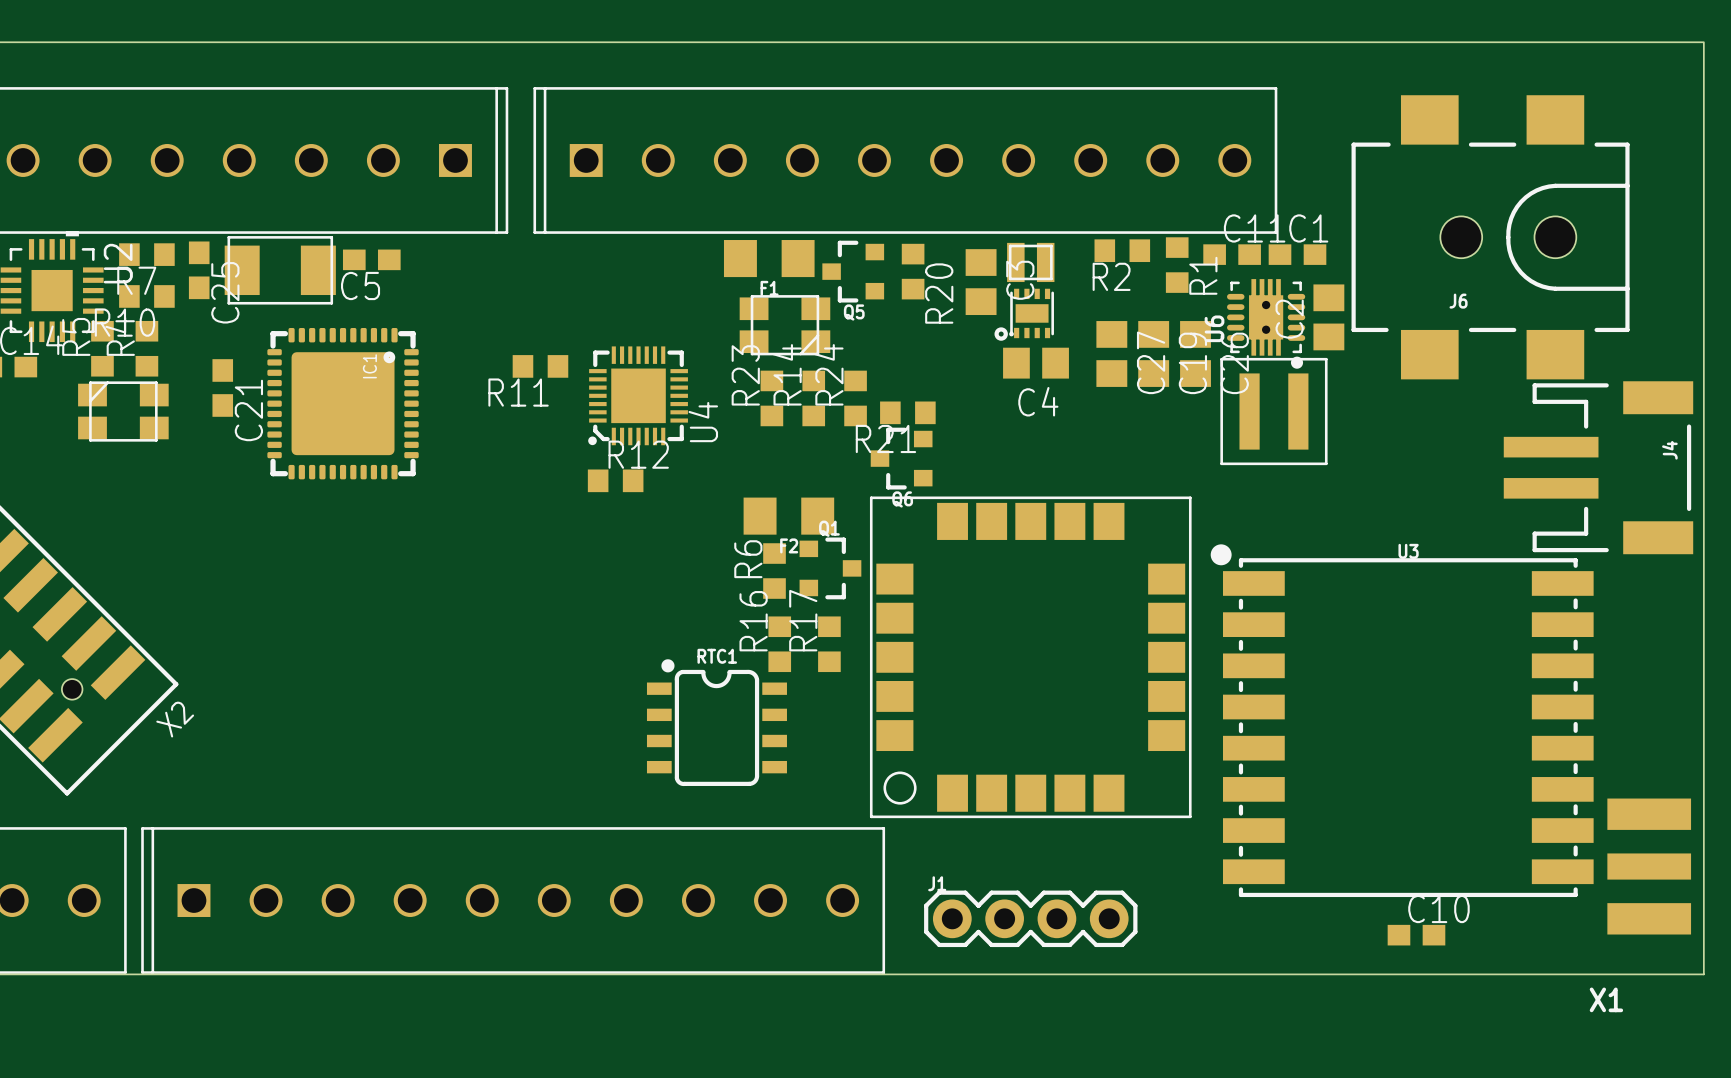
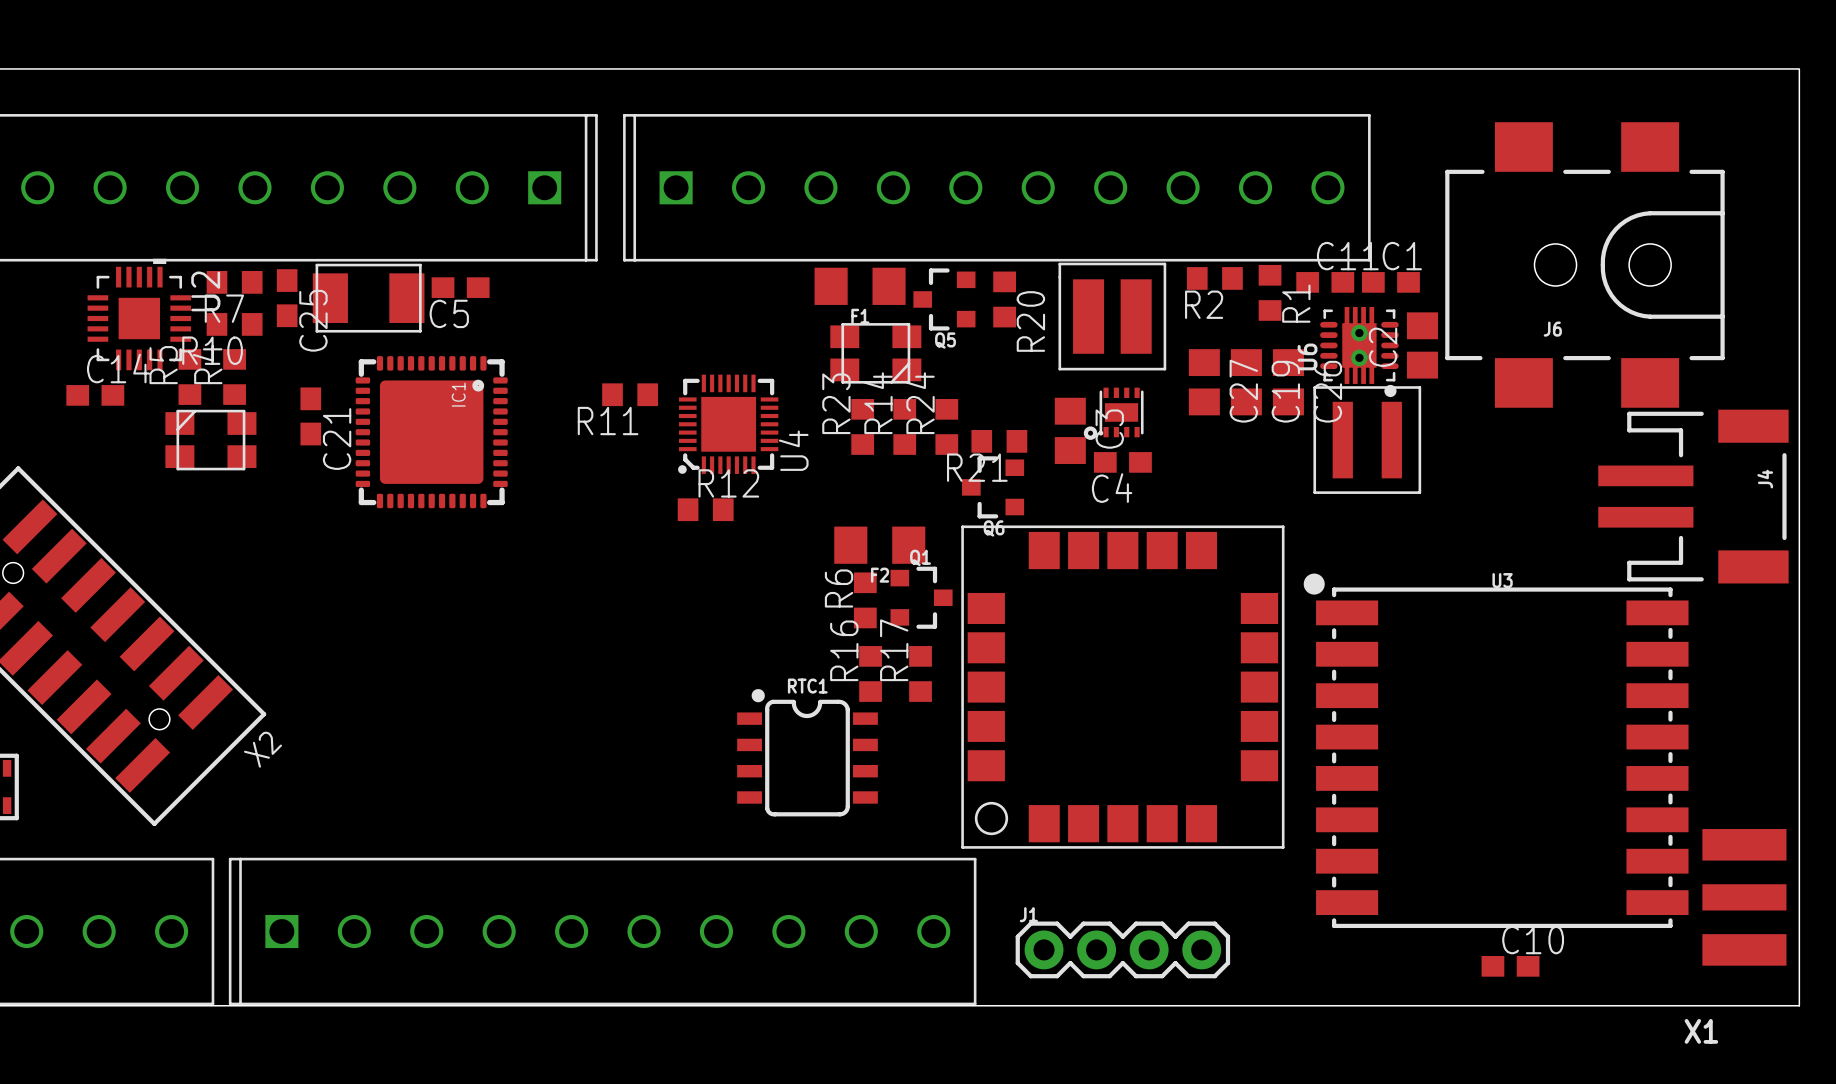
part: (1030, 262) -> none
C3 position: (981, 282) -> (1070, 430)
part: none -> (1112, 316)
part position: (1024, 314) -> (1113, 413)
C4 footprint: [1003, 347, 1069, 379] -> [1093, 452, 1152, 473]

